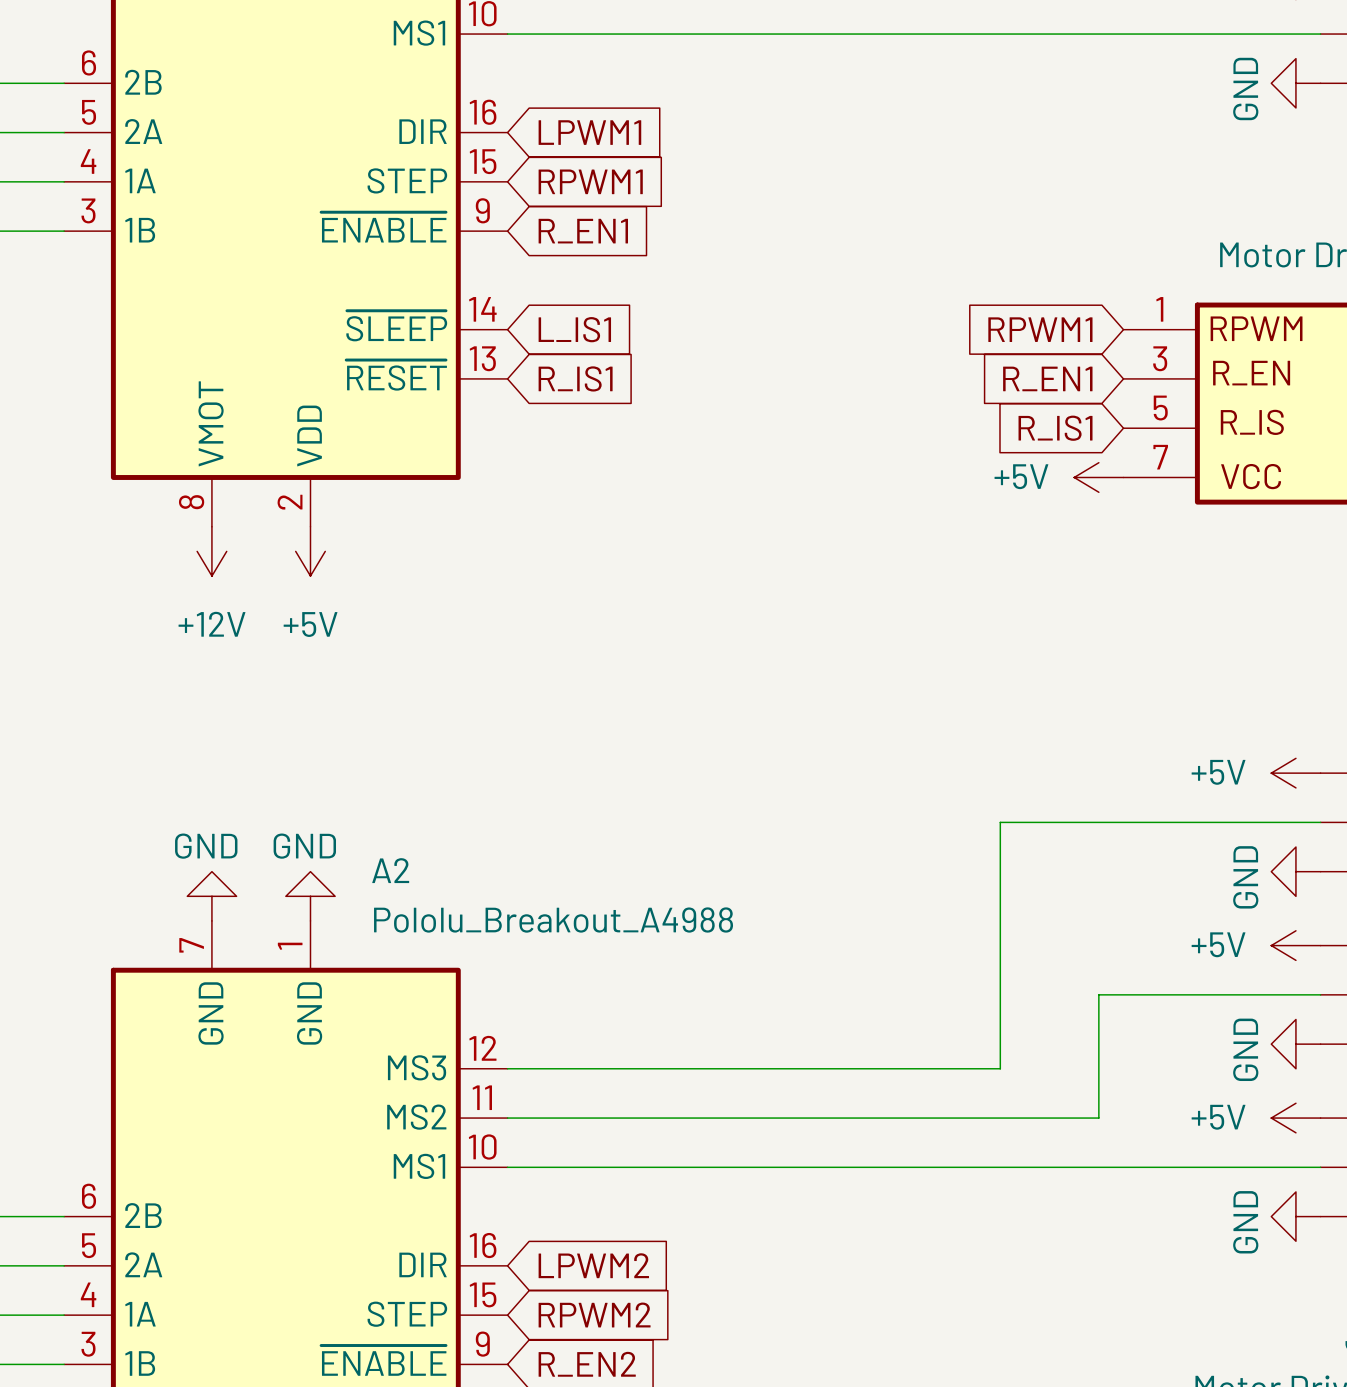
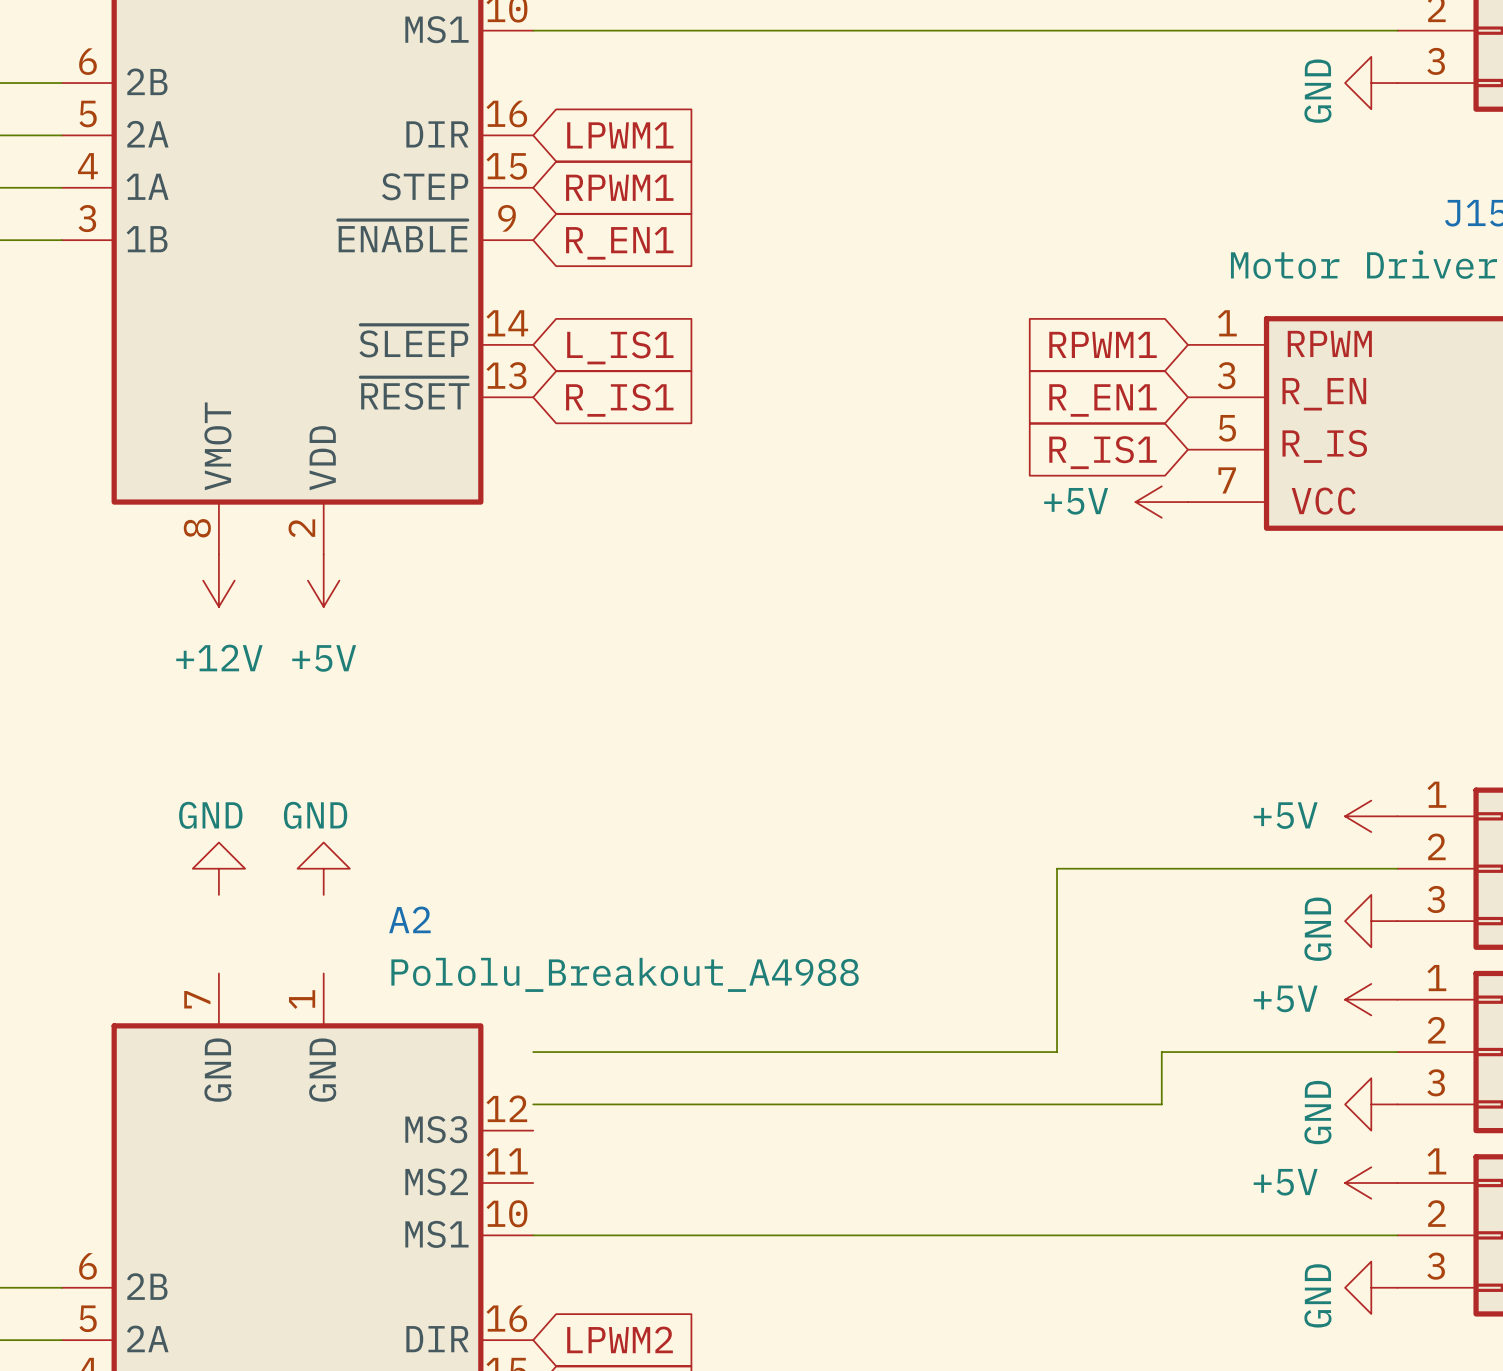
power symbol: none -> GND (218, 868)
power symbol: none -> GND (323, 868)
power symbol: GND (211, 896) -> none
power symbol: GND (310, 896) -> none
wire: (1000, 994) (1000, 1068) (507, 1068) -> (1057, 1052) (533, 1052)
wire: (1098, 1044) (1098, 1118) (507, 1118) -> (1161, 1104) (533, 1104)

